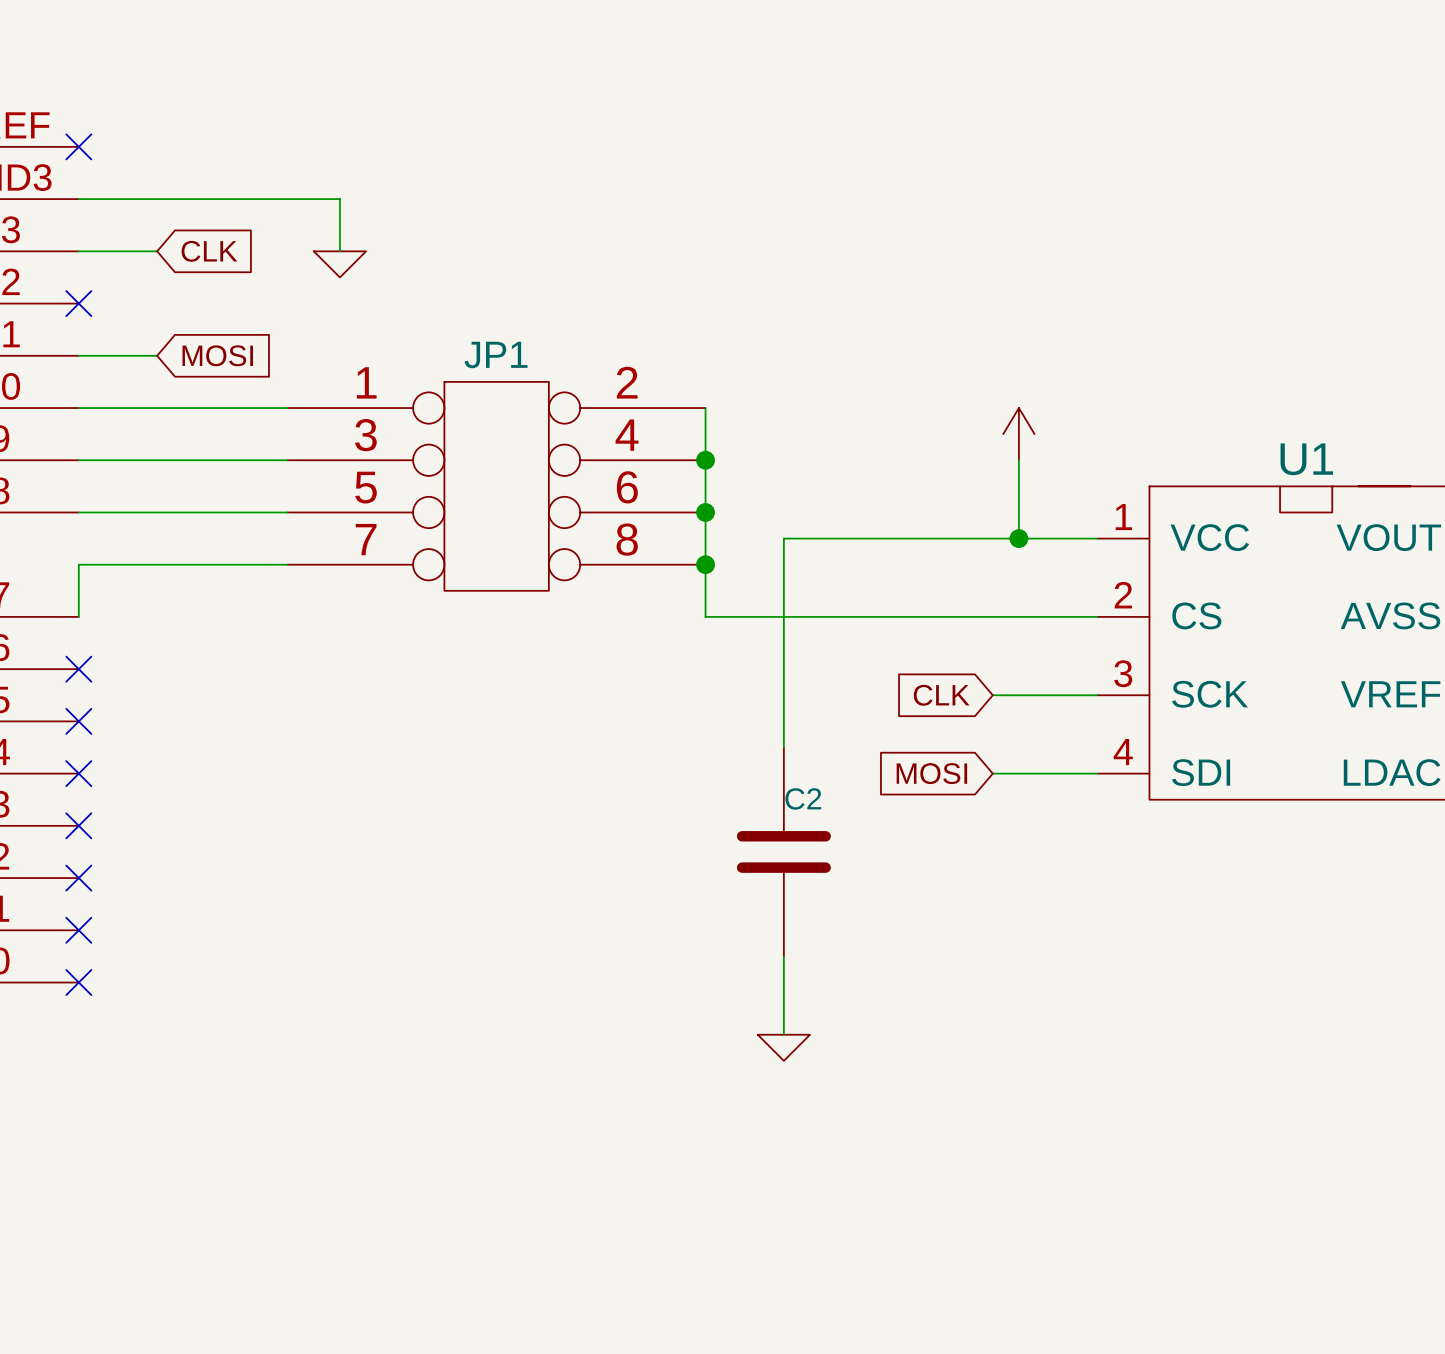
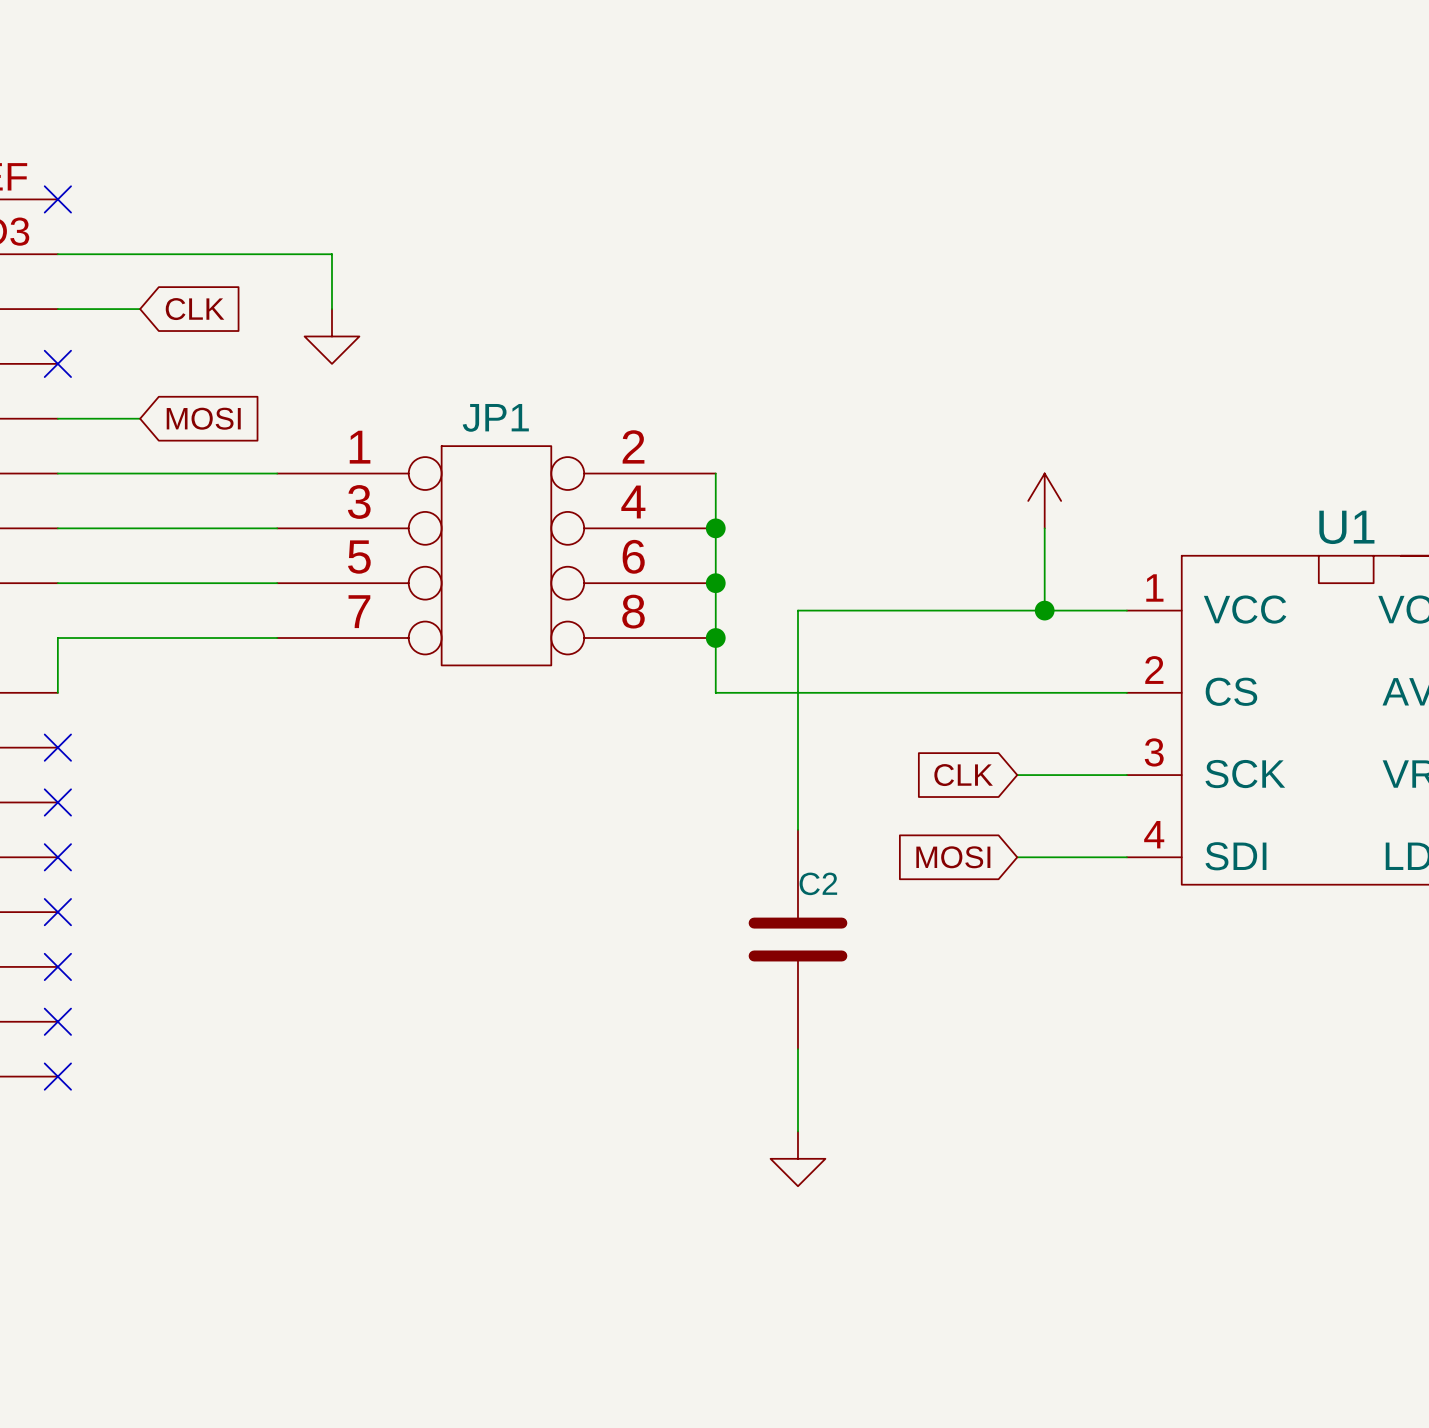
power symbol shape: [313, 251, 367, 278] -> [304, 309, 360, 364]
power symbol shape: [757, 1034, 811, 1061] -> [770, 1131, 826, 1187]

